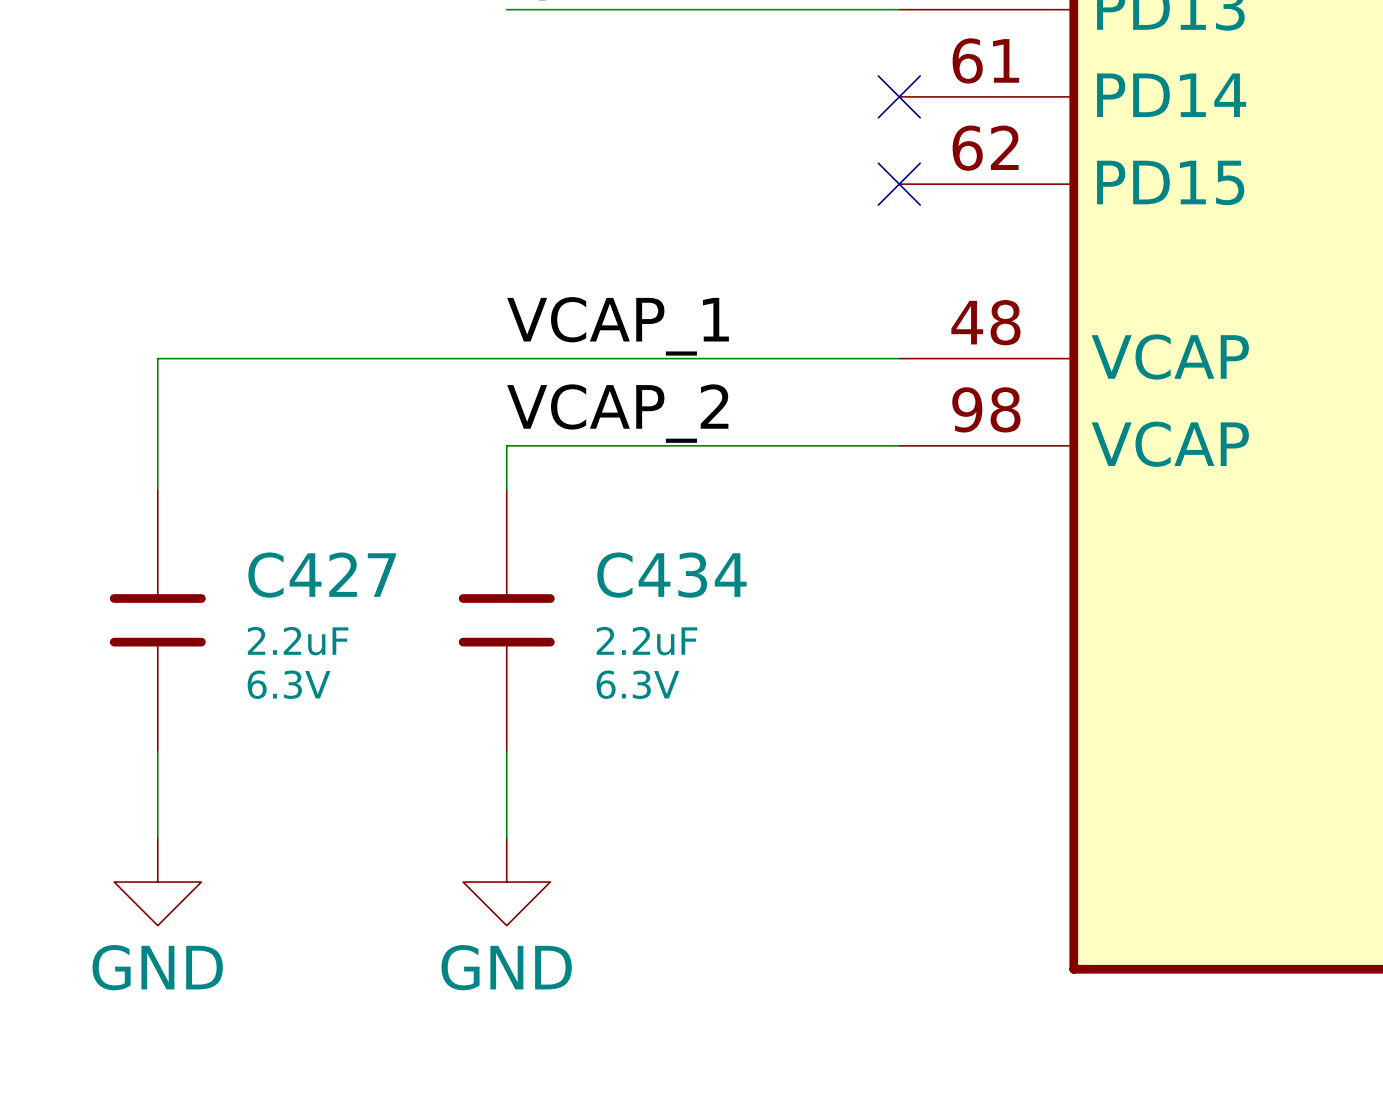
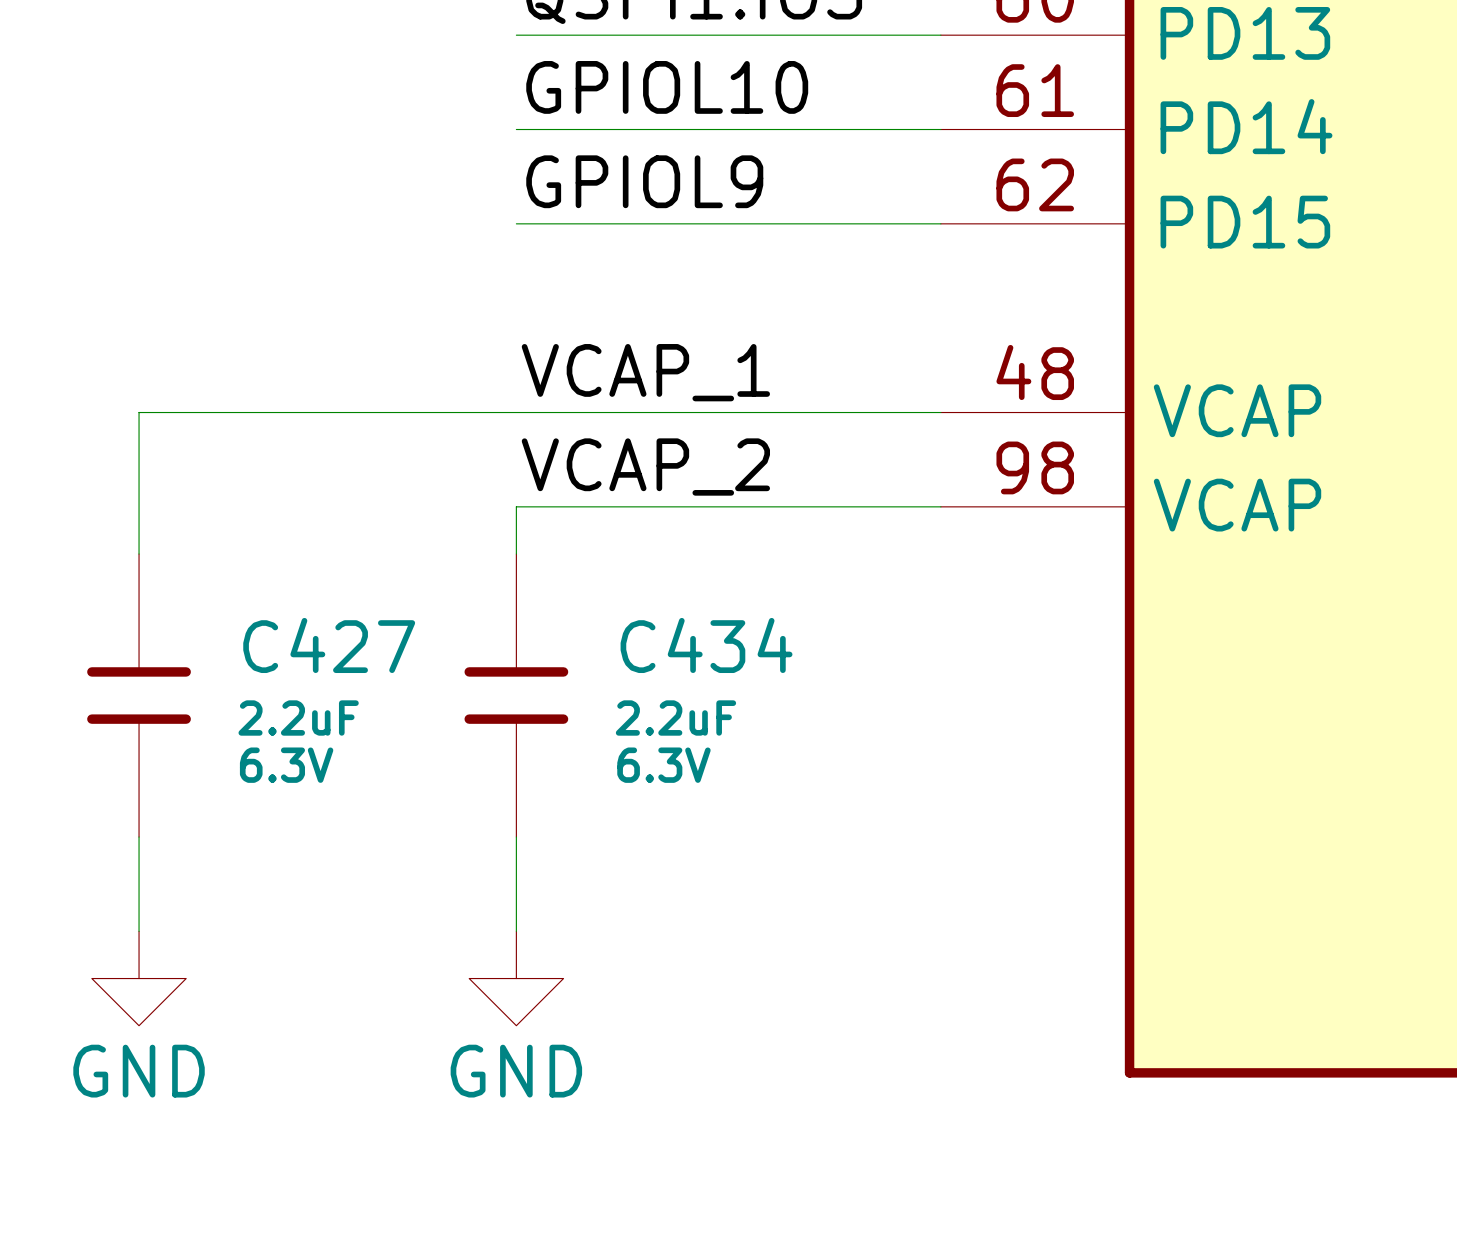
label: none -> GPIOL10 (667, 87)
wire: none -> (516, 129) (940, 129)
no-connect mark: (899, 96) -> none
label: none -> GPIOL9 (644, 181)
wire: none -> (516, 223) (940, 223)
no-connect mark: (899, 184) -> none

